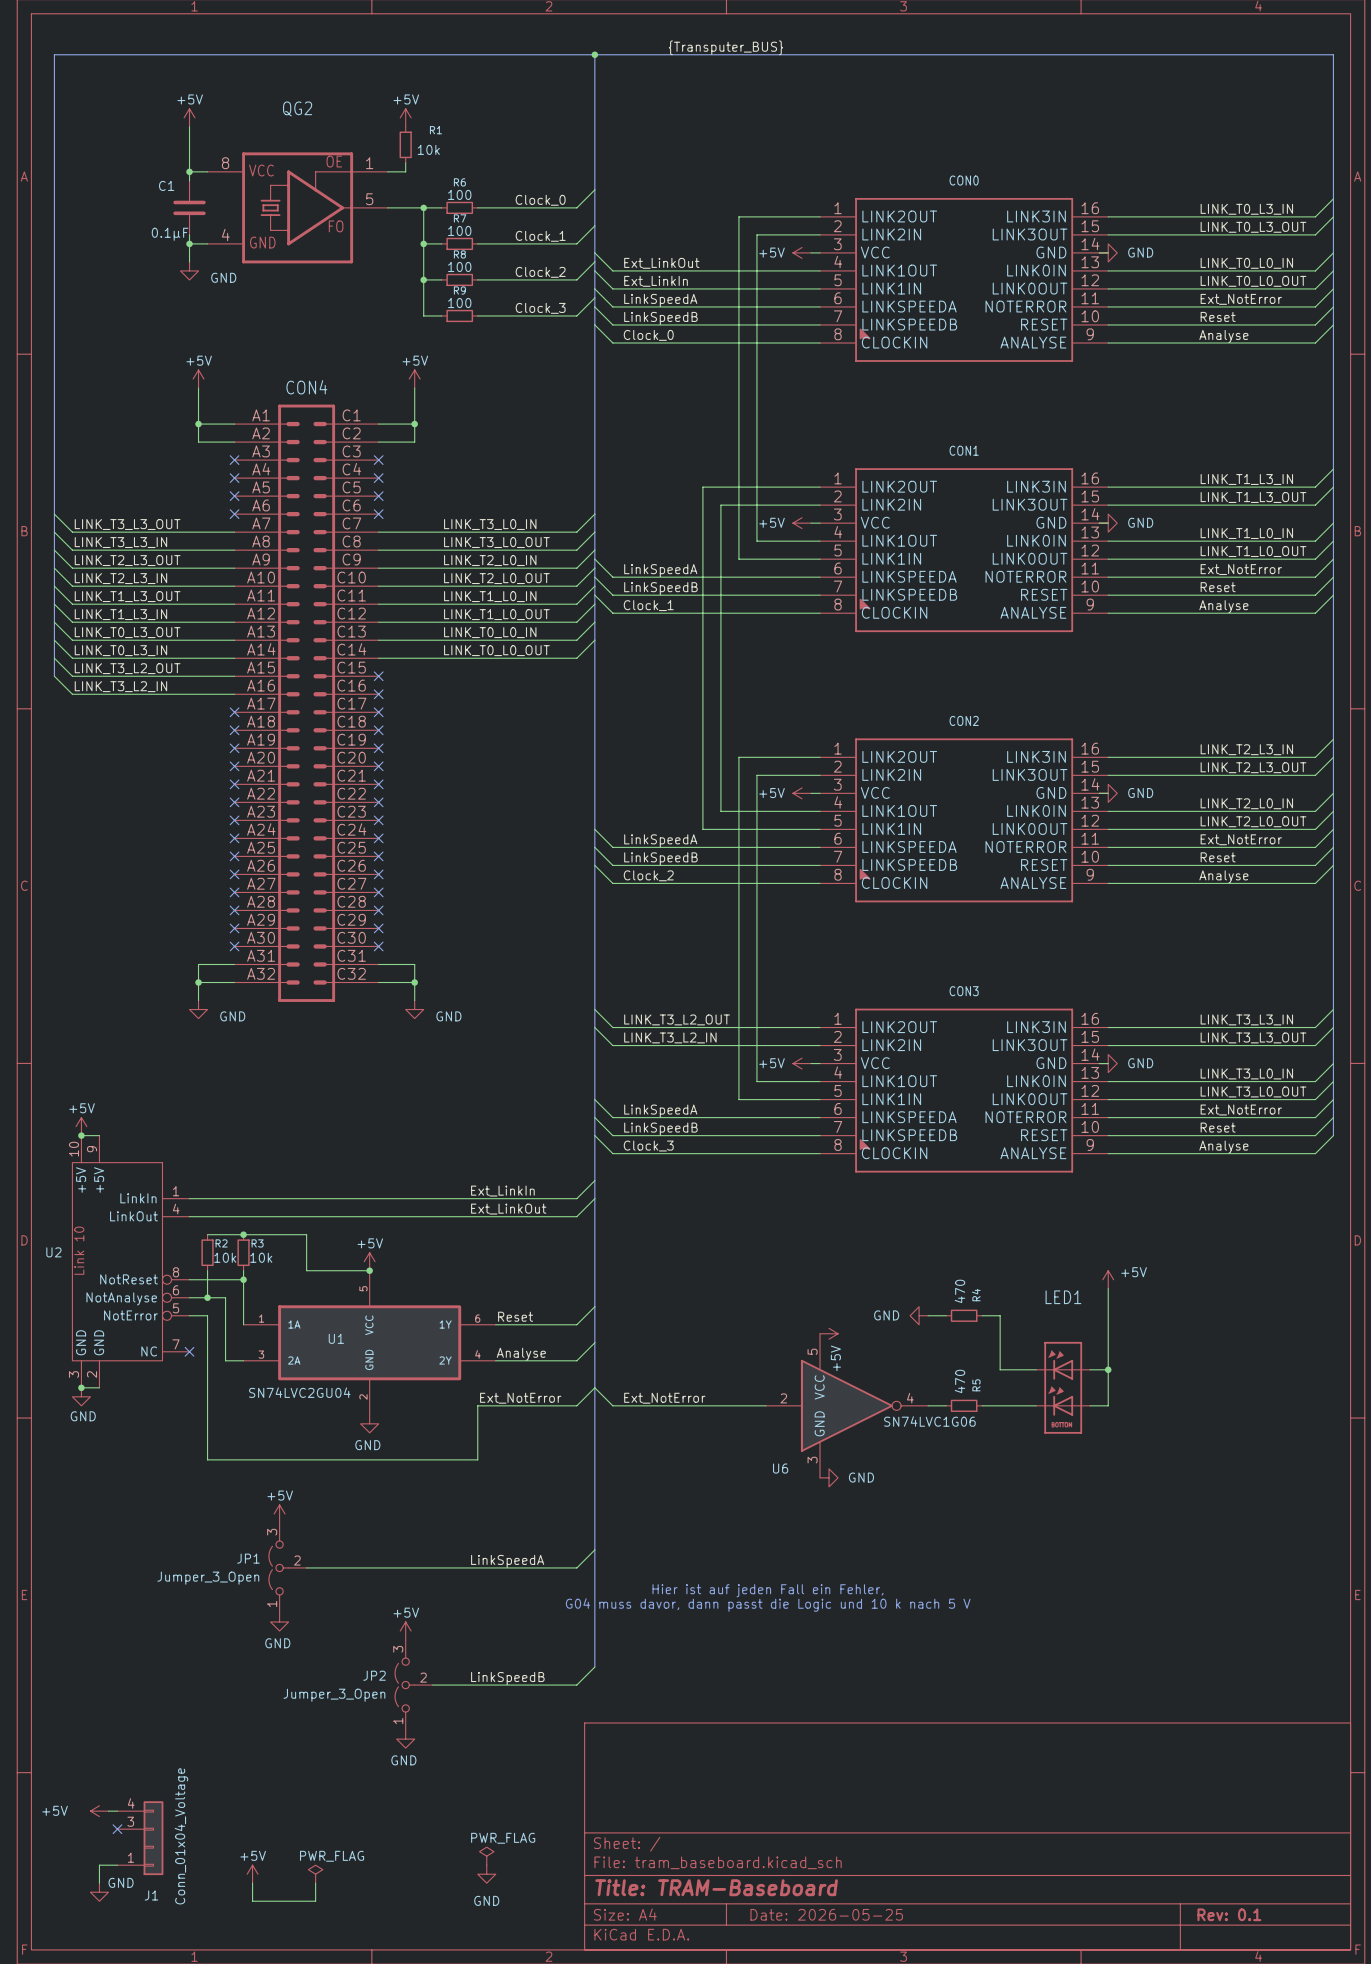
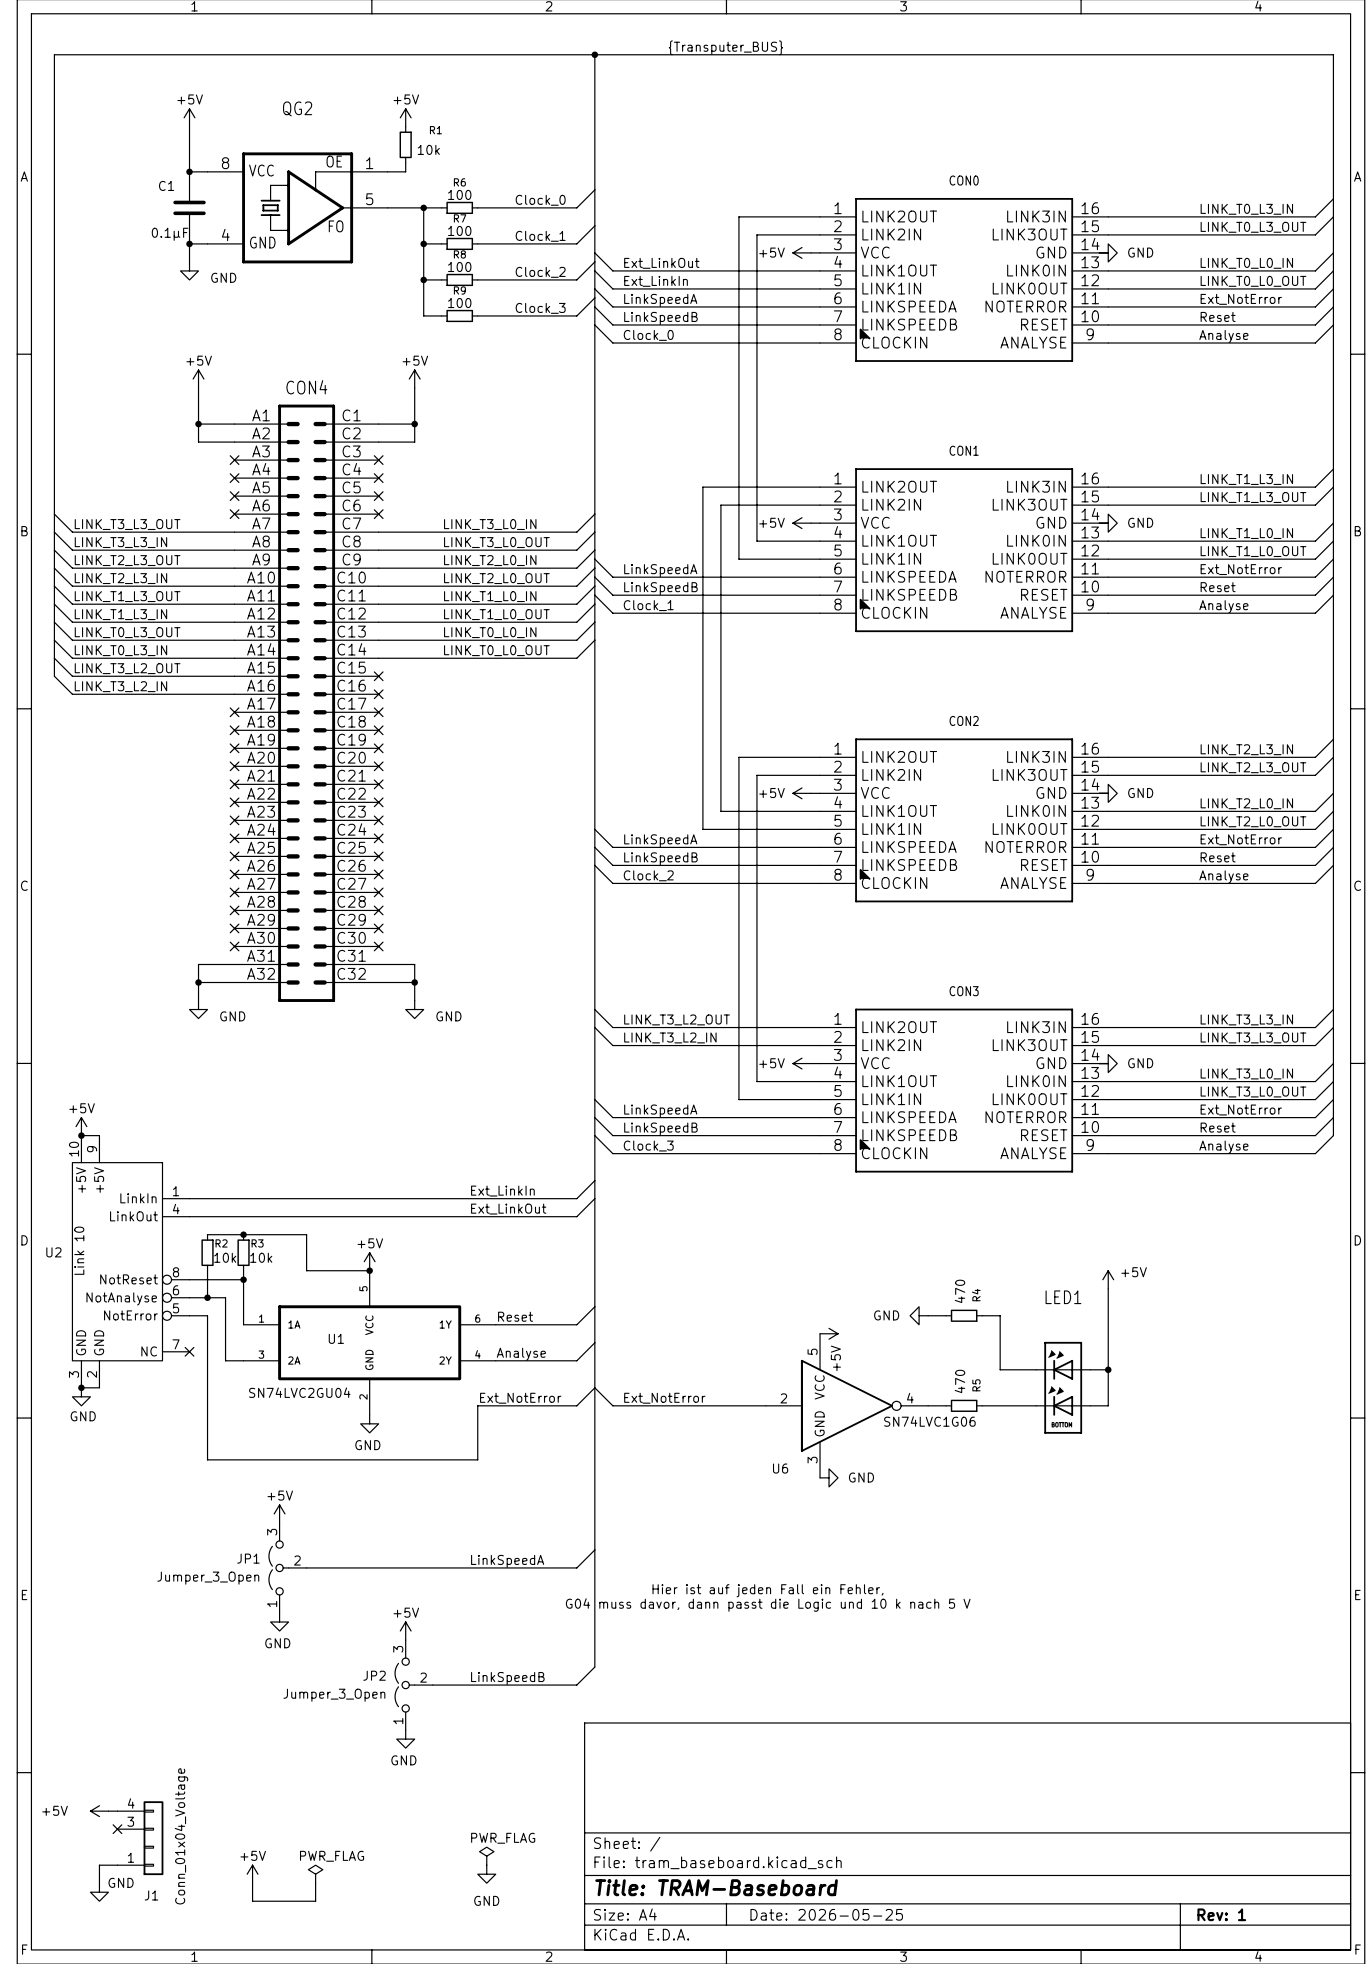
title block: Rev: 0.1 (1229, 1914) -> Rev: 1 (1221, 1914)

